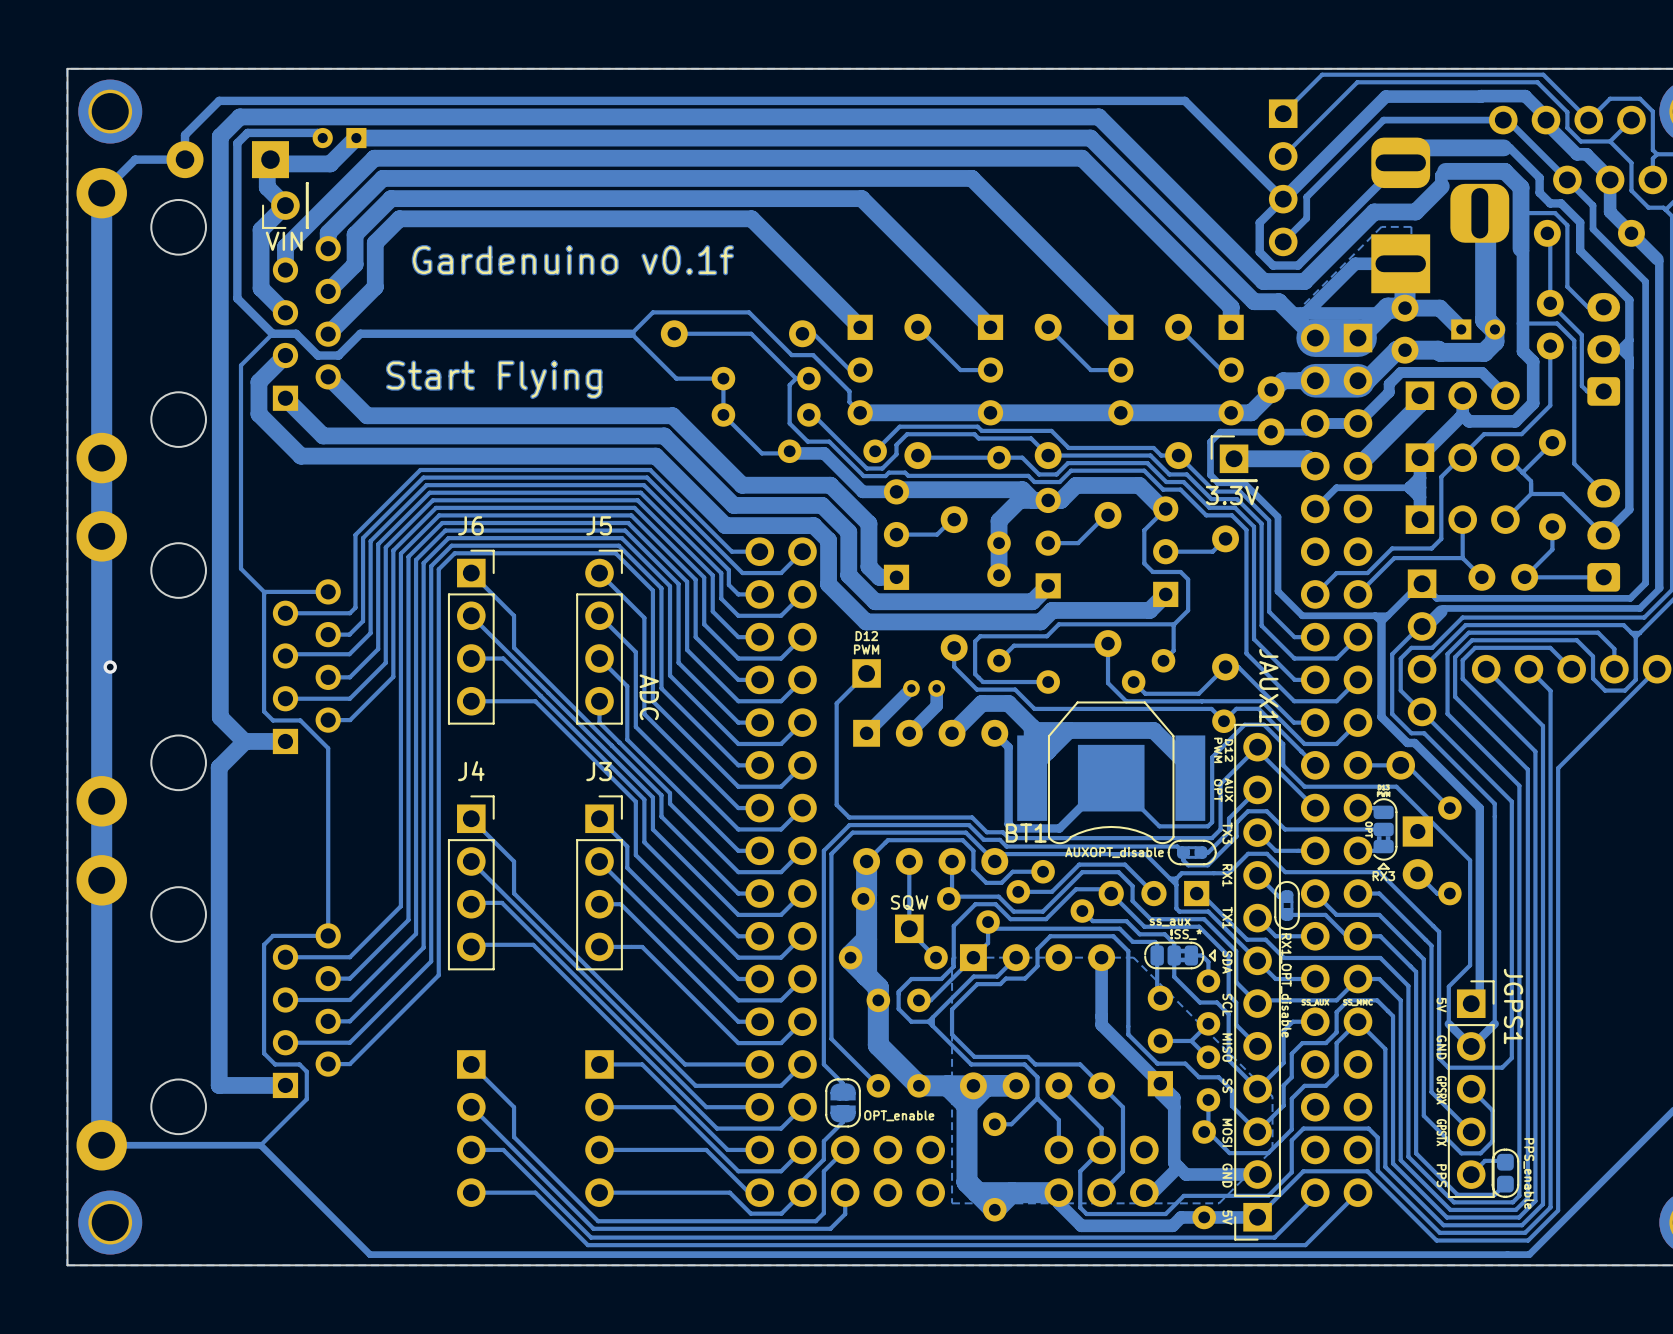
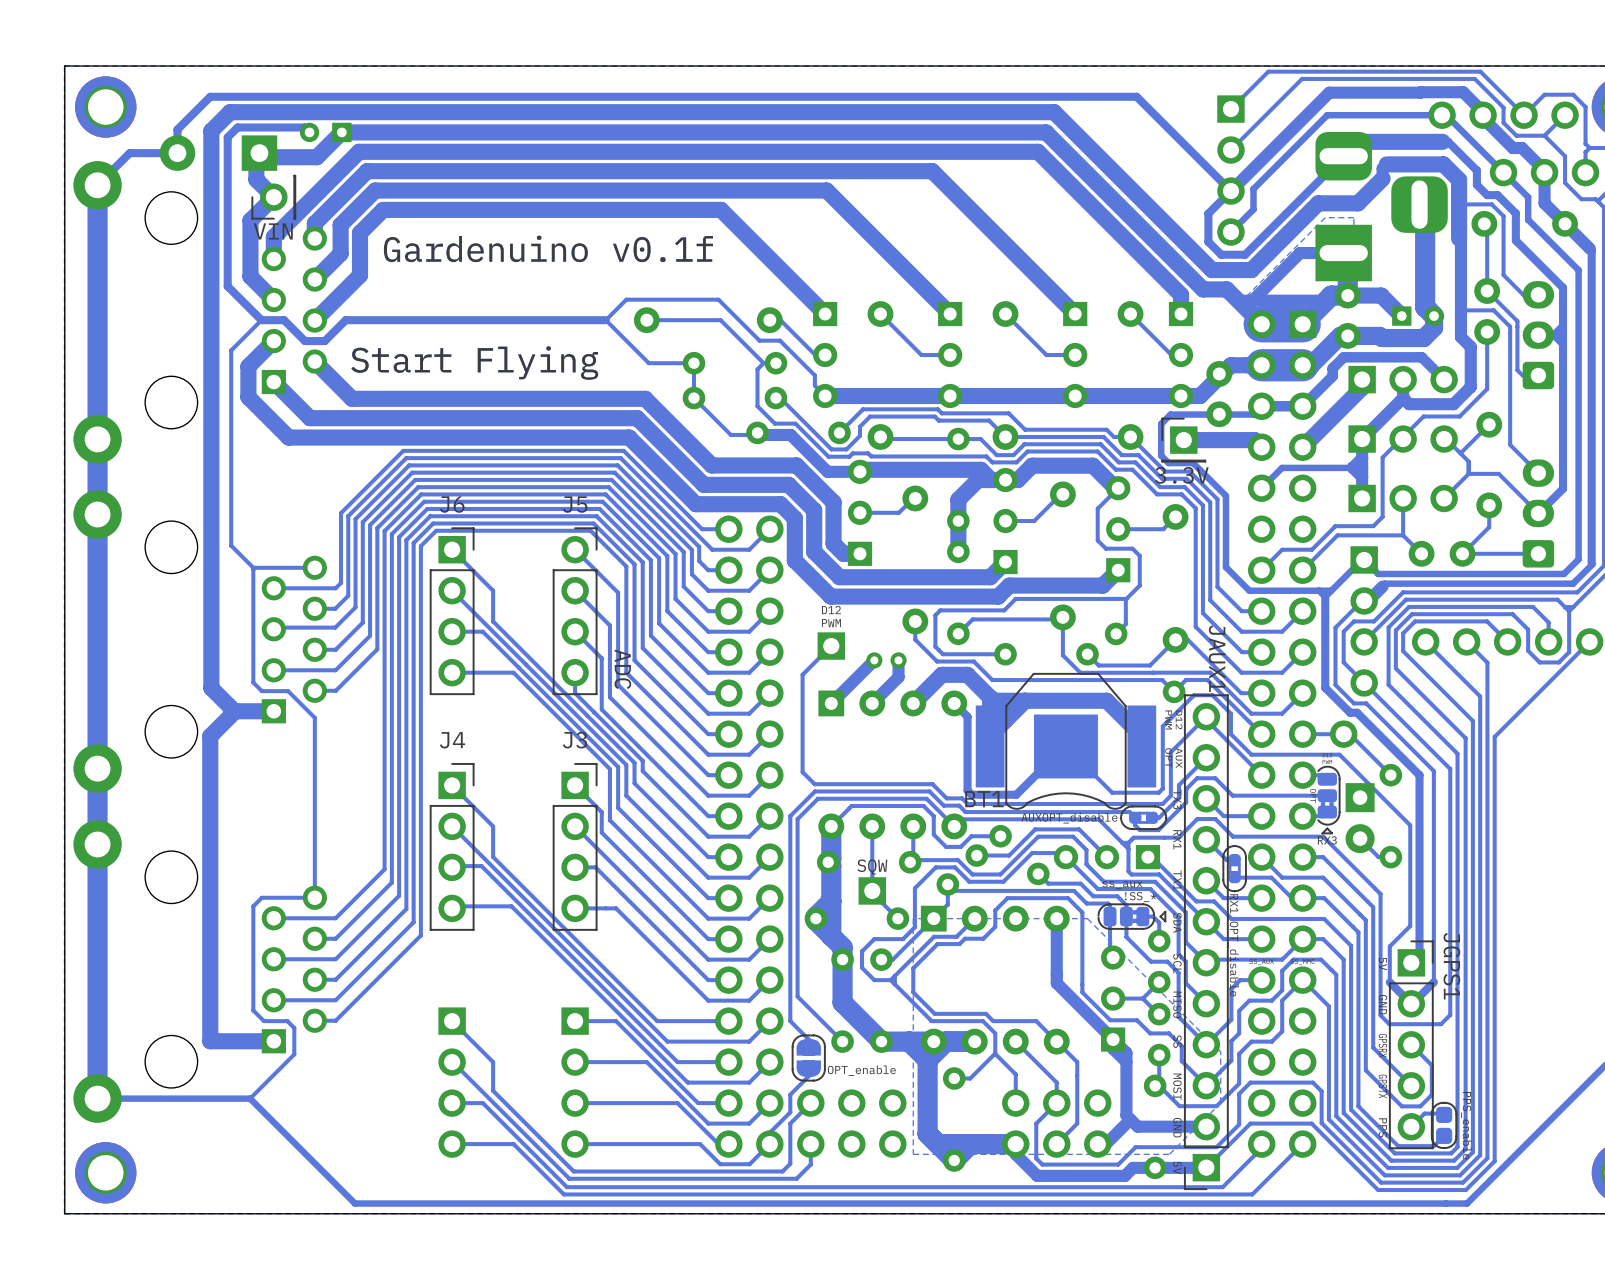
via: (110, 667) -> none

